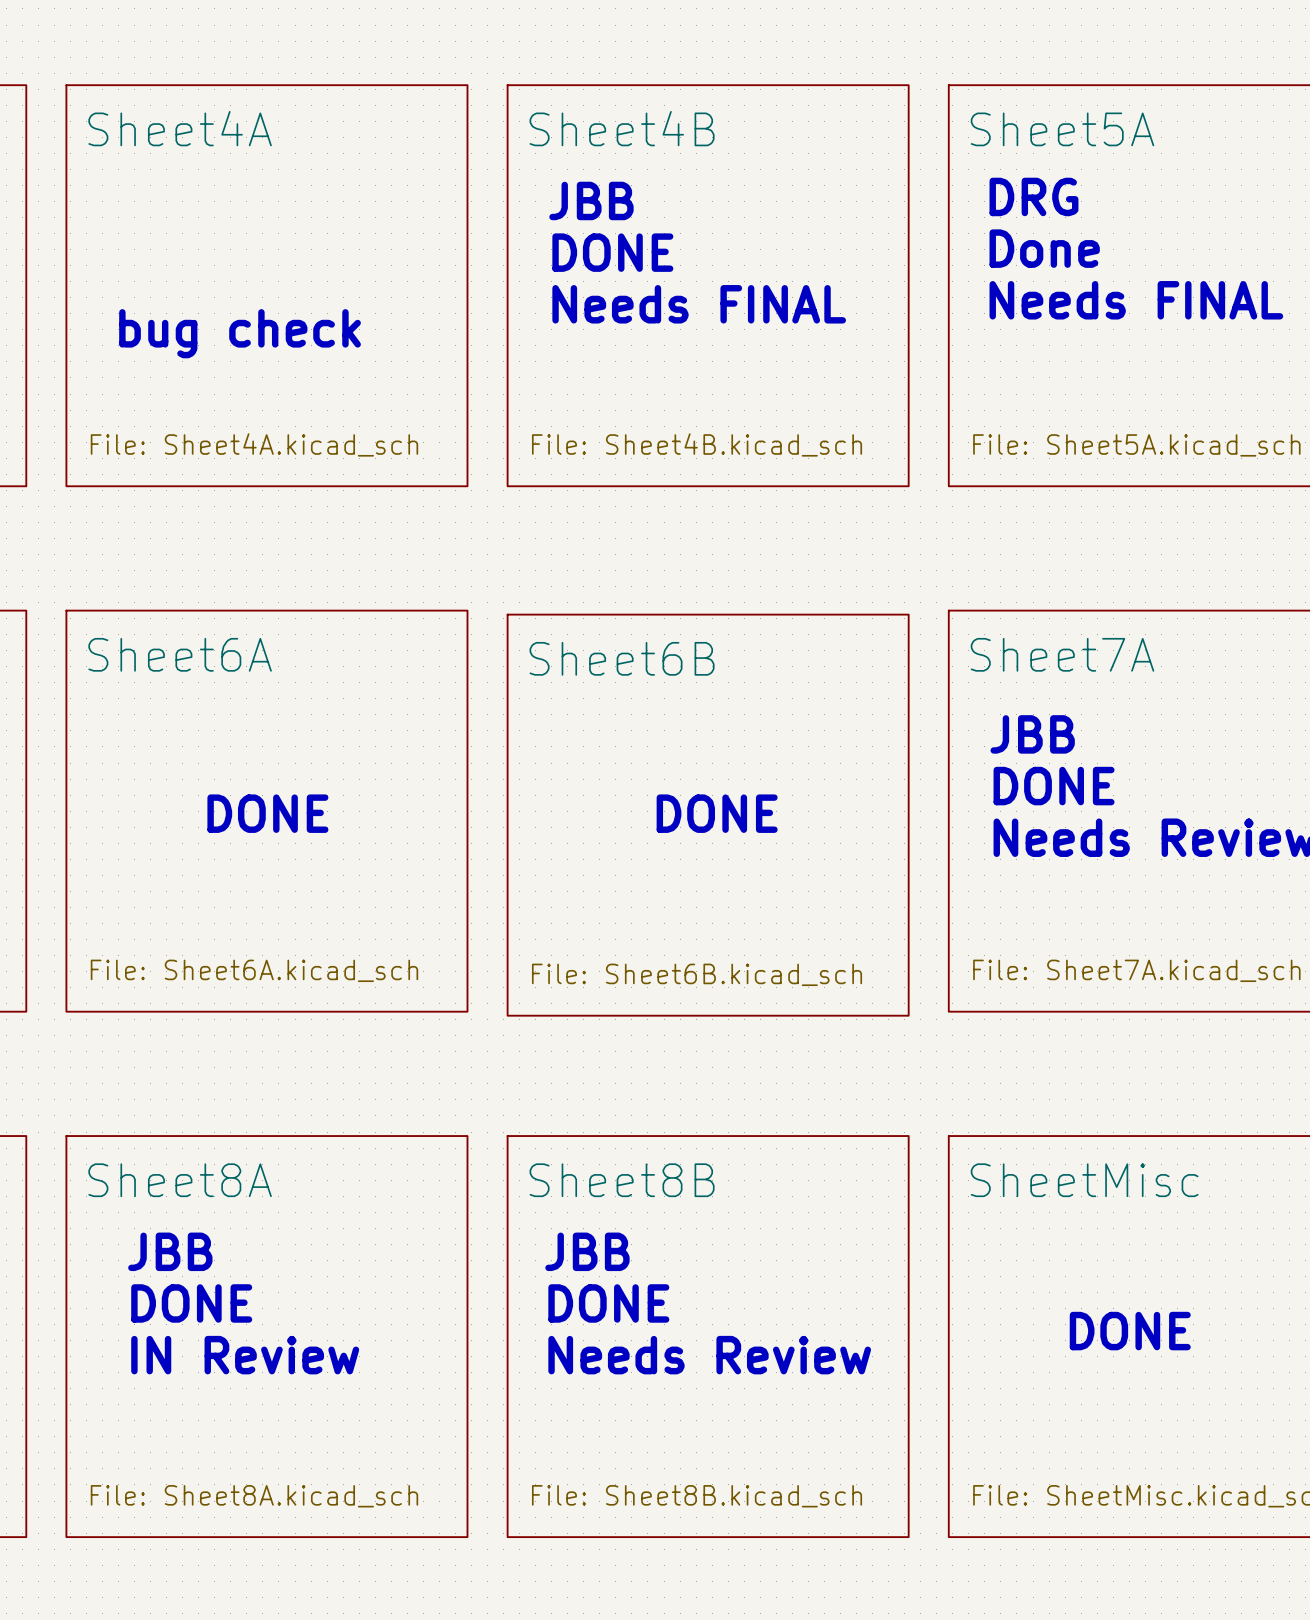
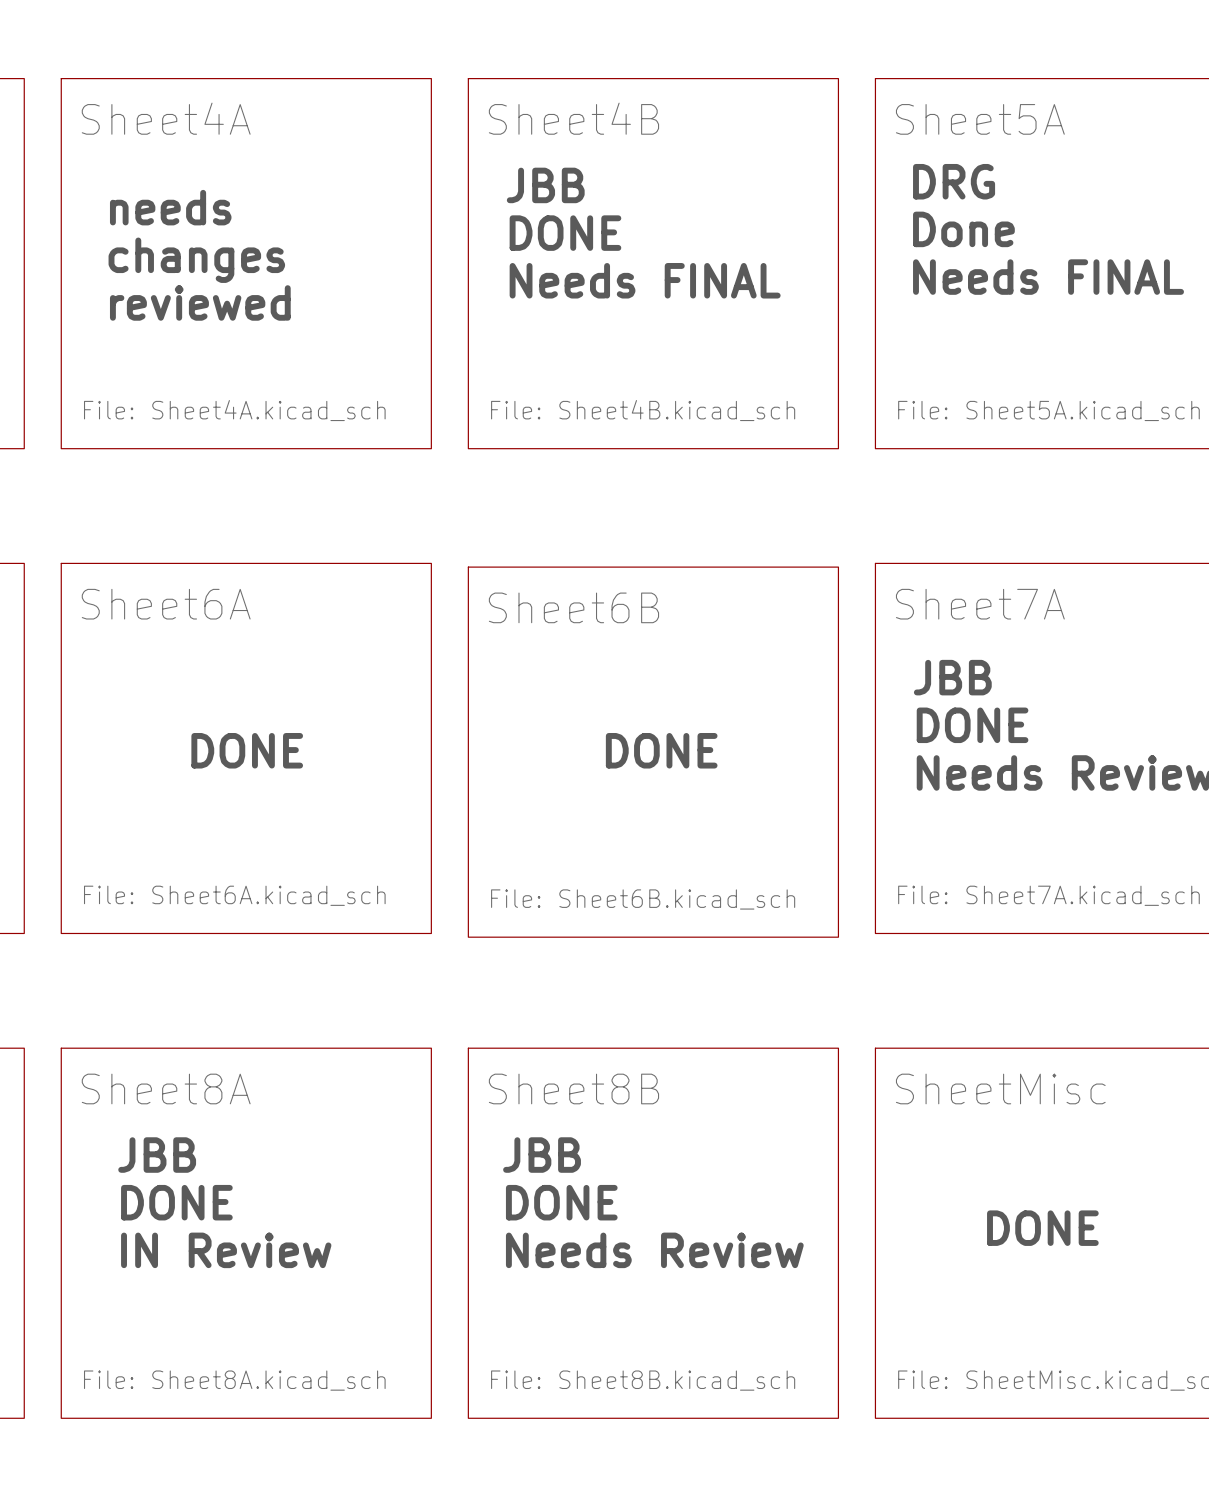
text: none -> needs (170, 207)
text: none -> changes (196, 260)
text: bug check (240, 333) -> reviewed (200, 302)

